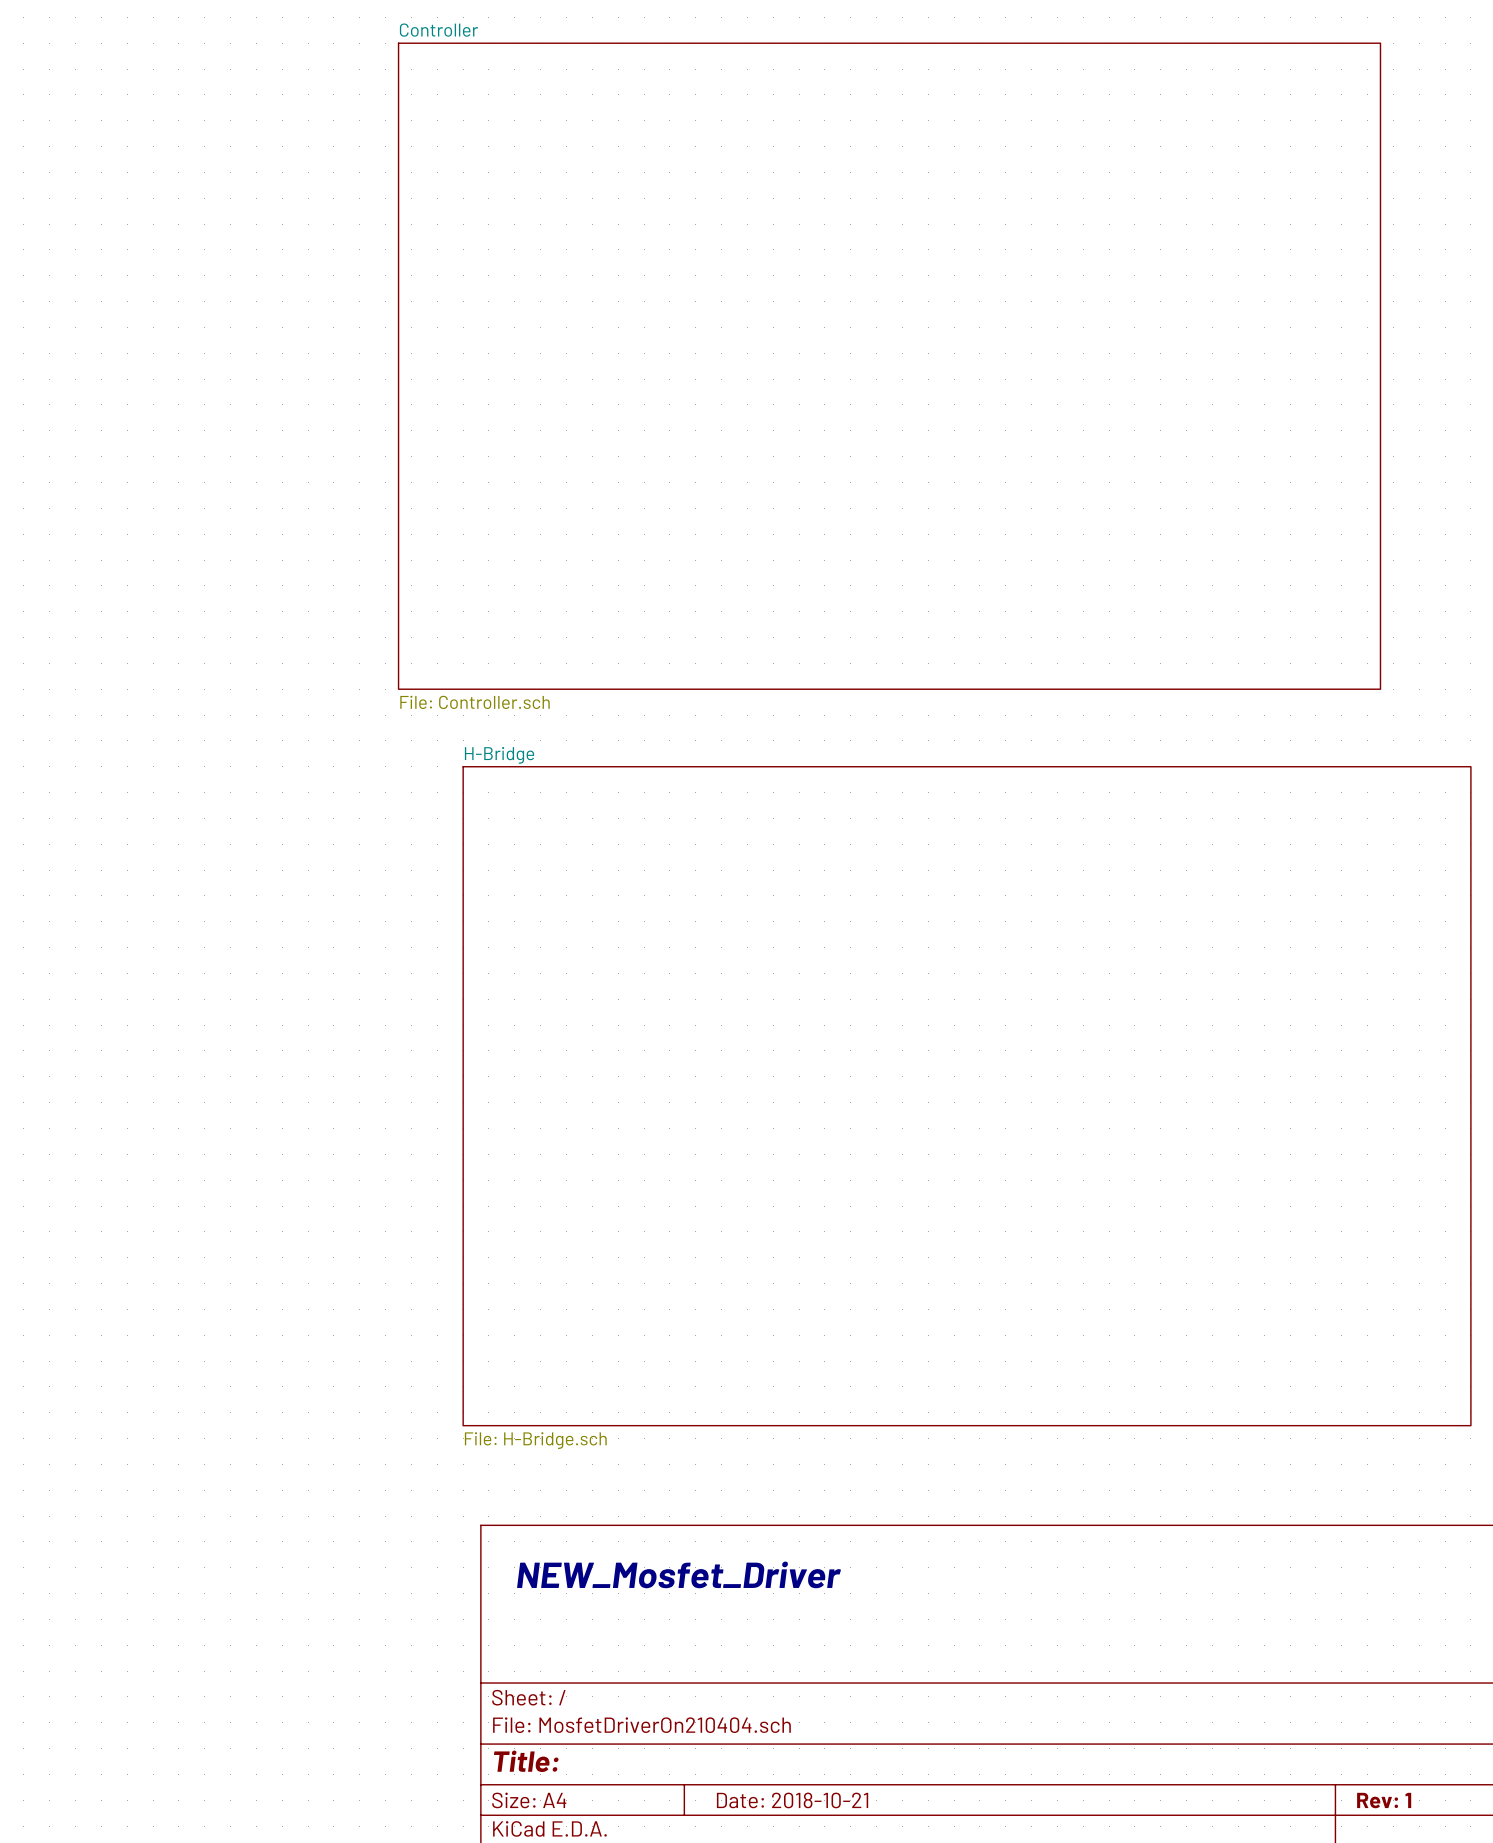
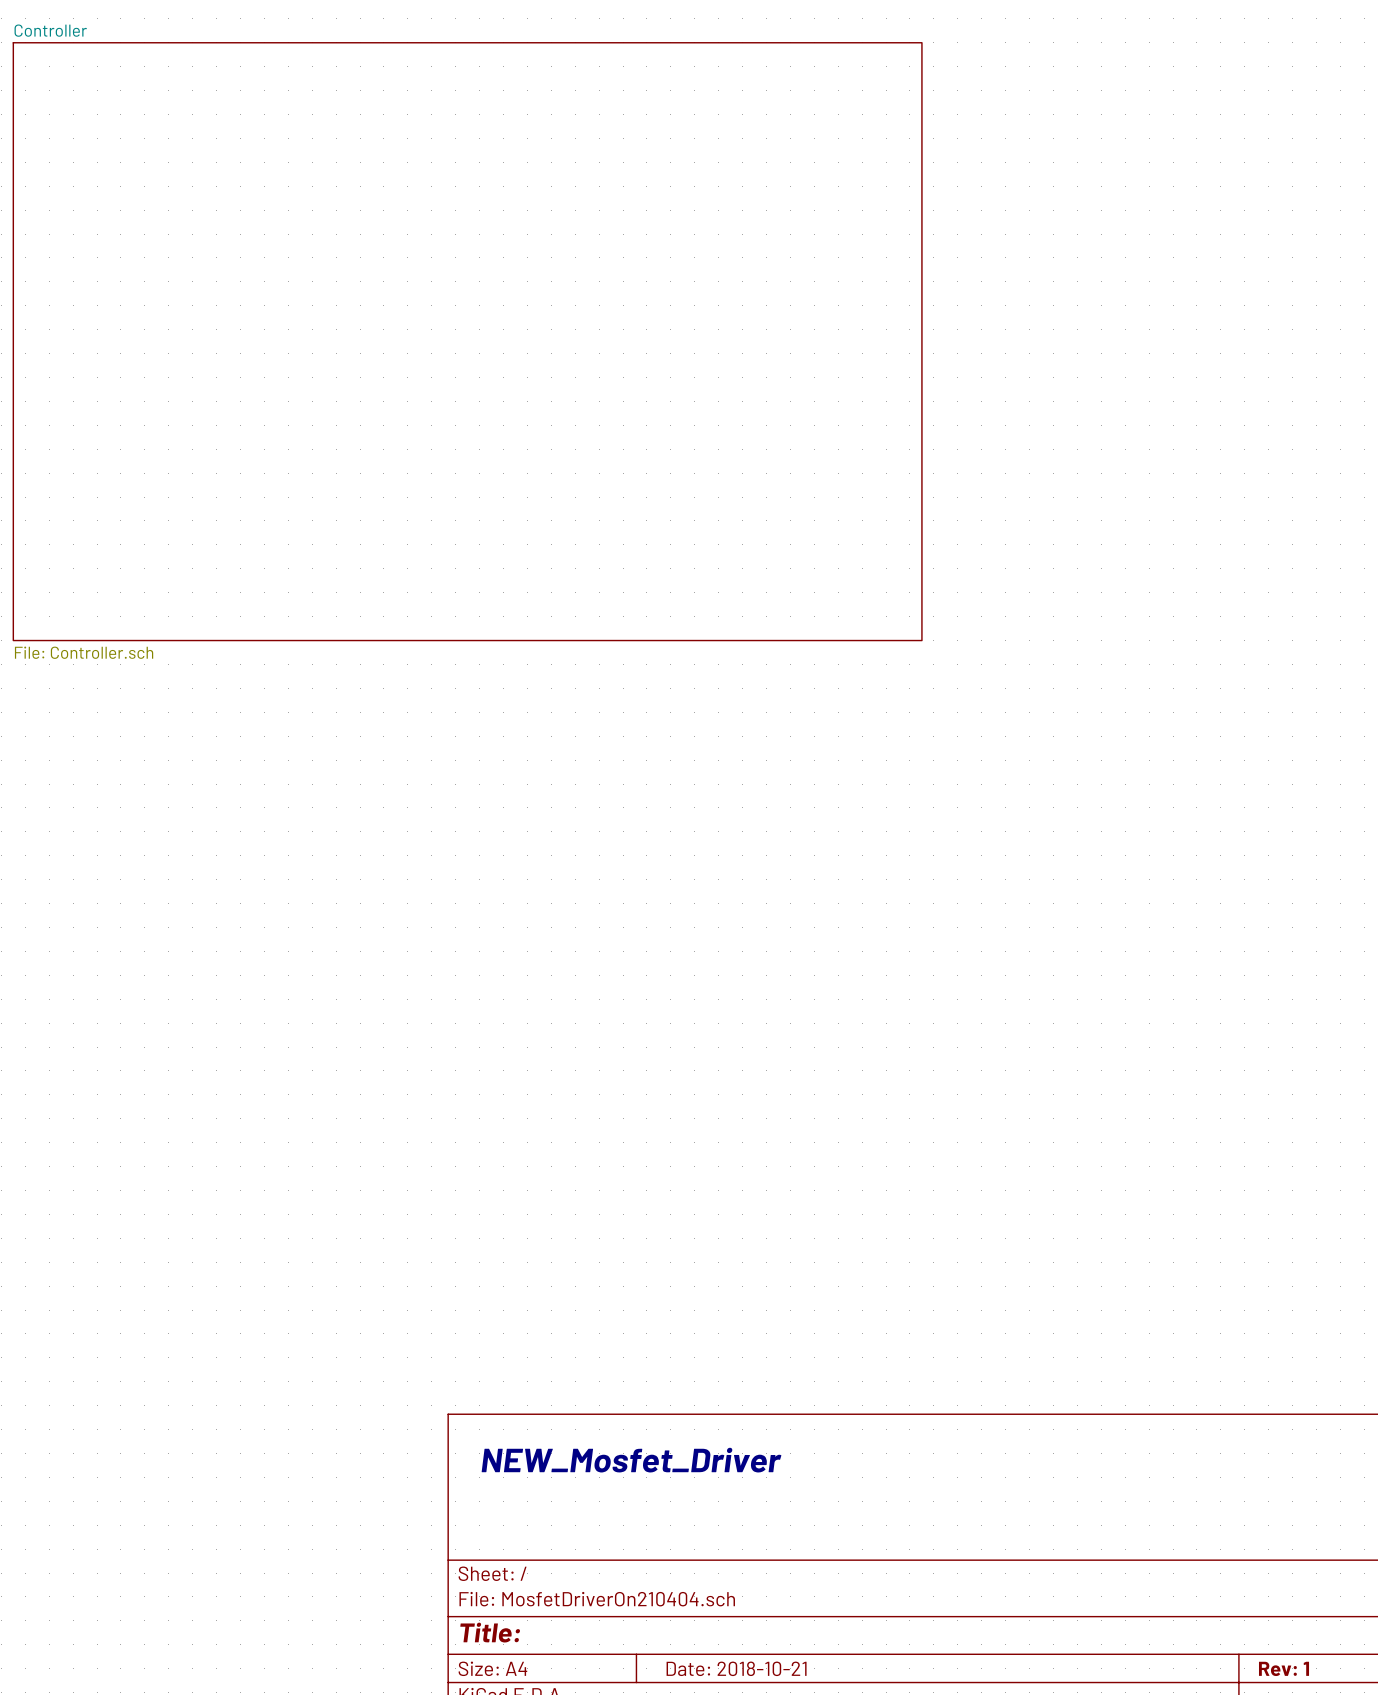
sheet Controller: none -> File: Controller.sch (467, 341)
sheet Controller: File: Controller.sch (889, 366) -> none
sheet H-Bridge: File: H-Bridge.sch (967, 1096) -> none

